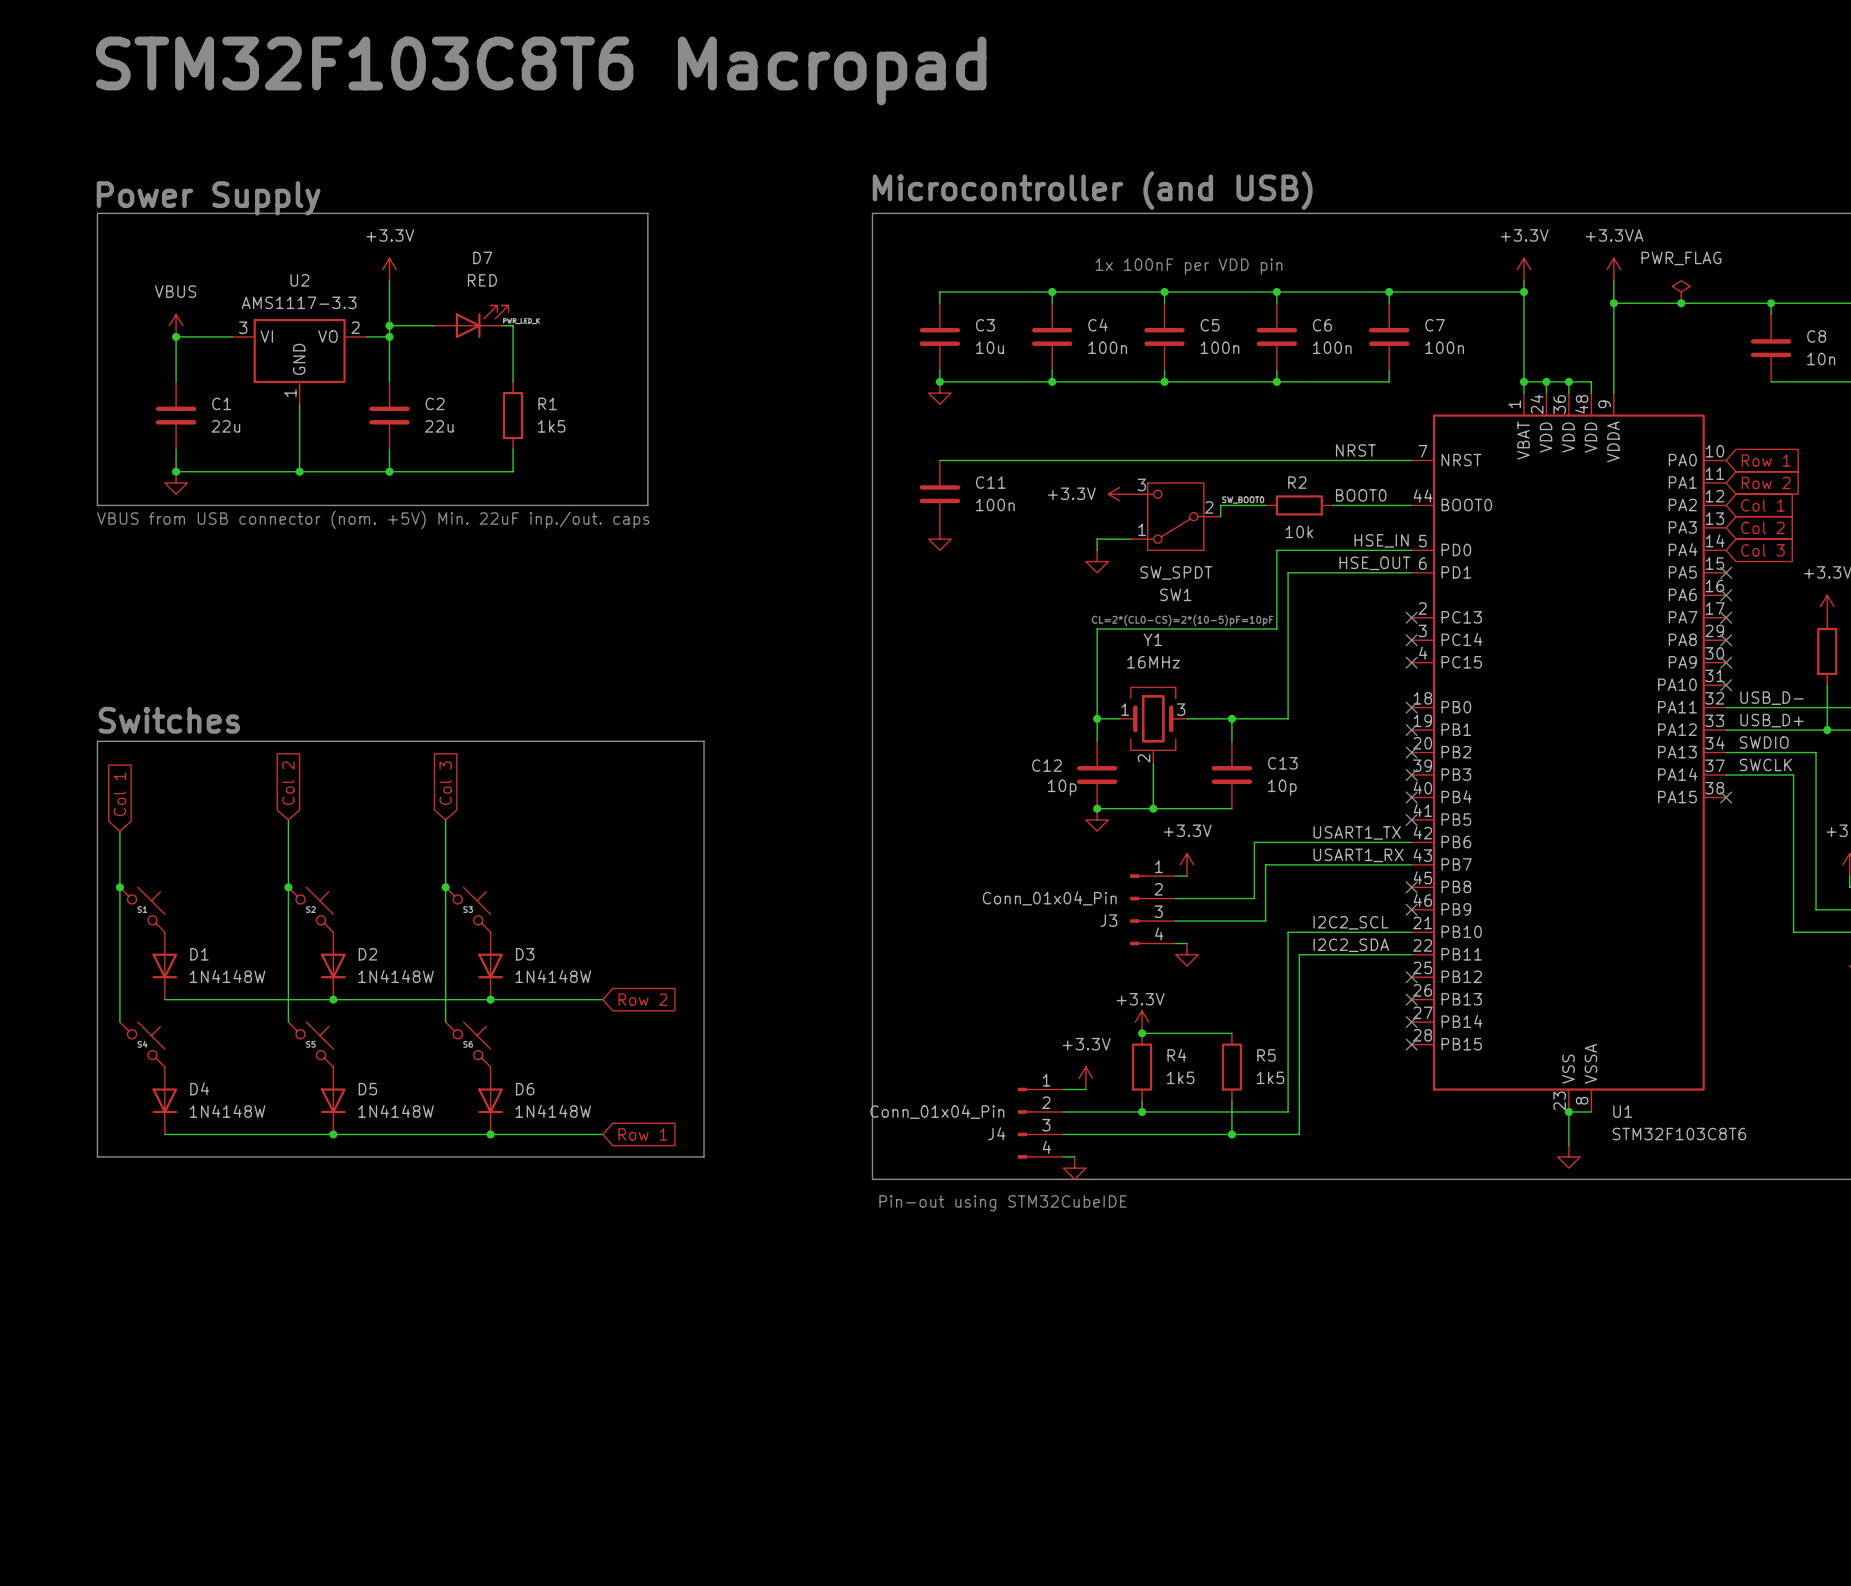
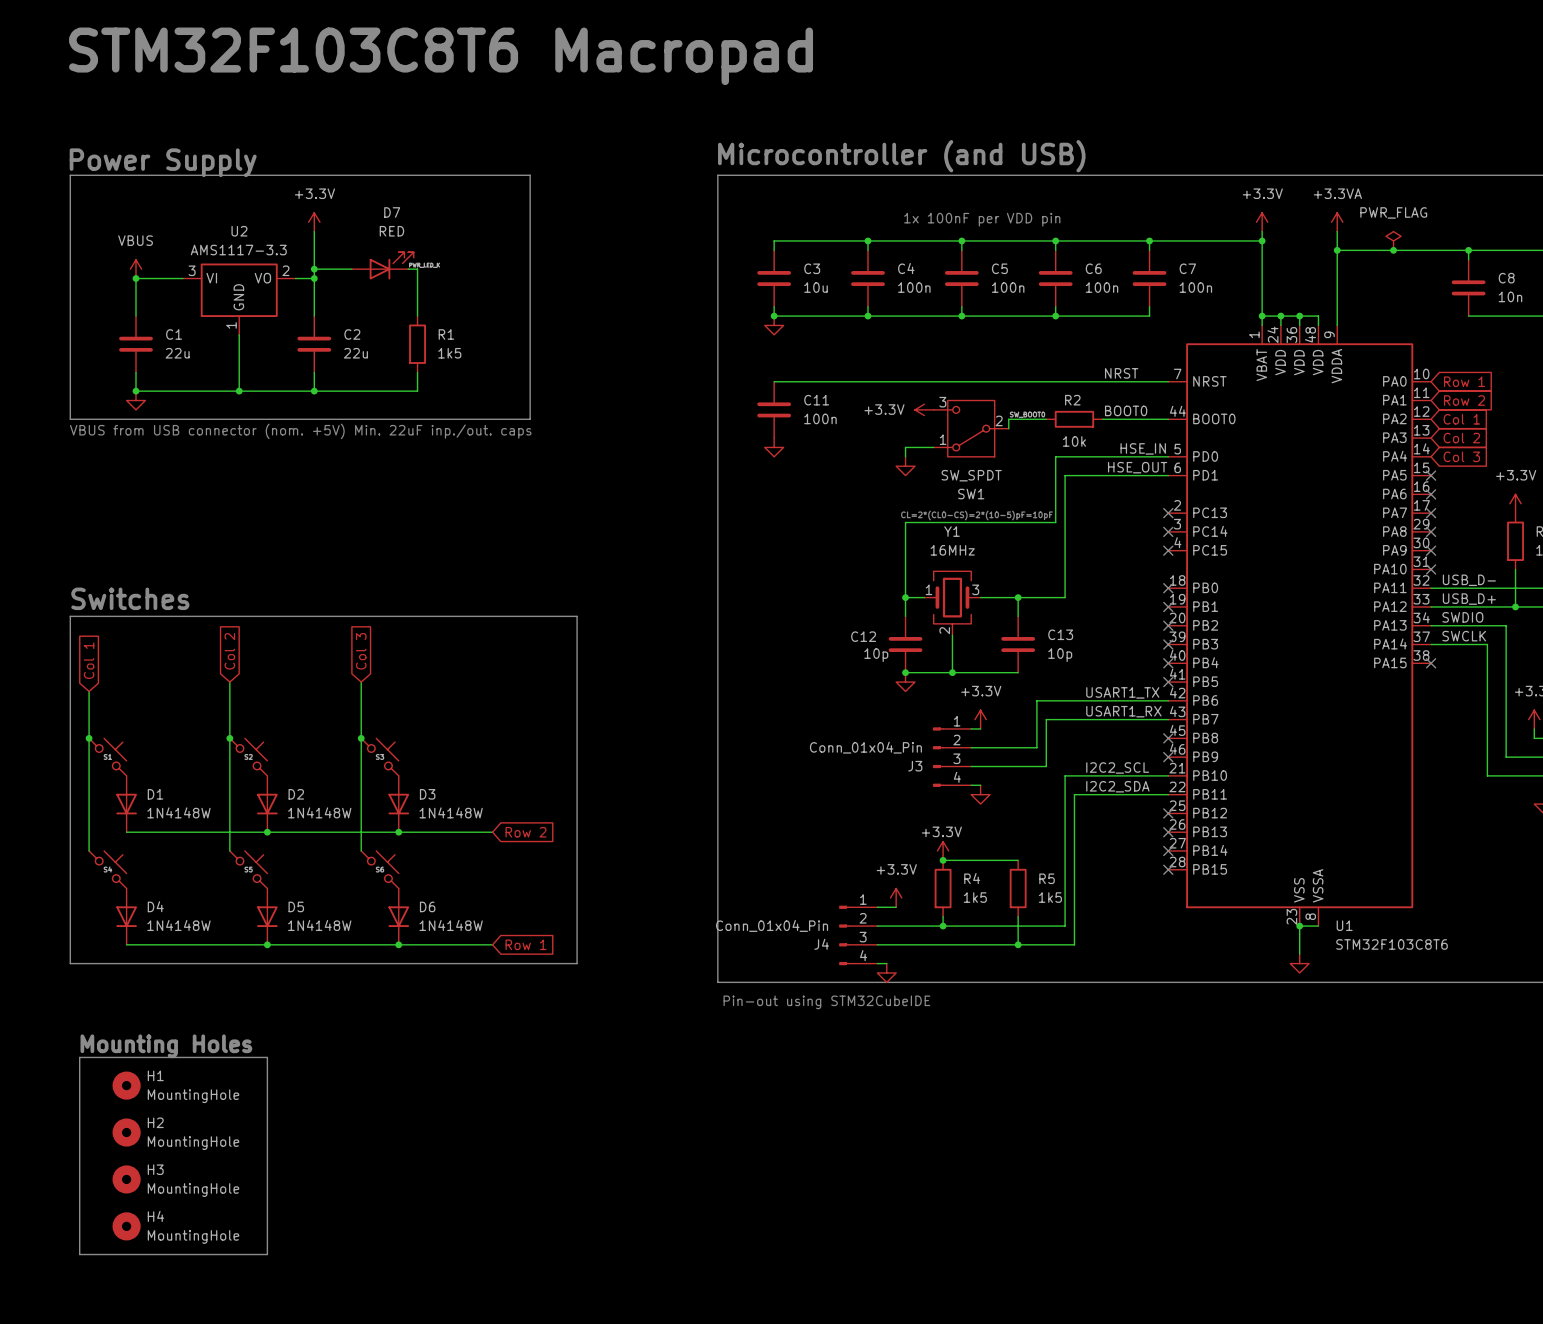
text: none -> Mounting Holes (166, 1046)
line: none -> (79, 1057) (267, 1057) (267, 1254) (79, 1254) (79, 1057)
H1: none -> MountingHole (126, 1085)
H2: none -> MountingHole (126, 1132)
H3: none -> MountingHole (126, 1179)
H4: none -> MountingHole (126, 1226)

